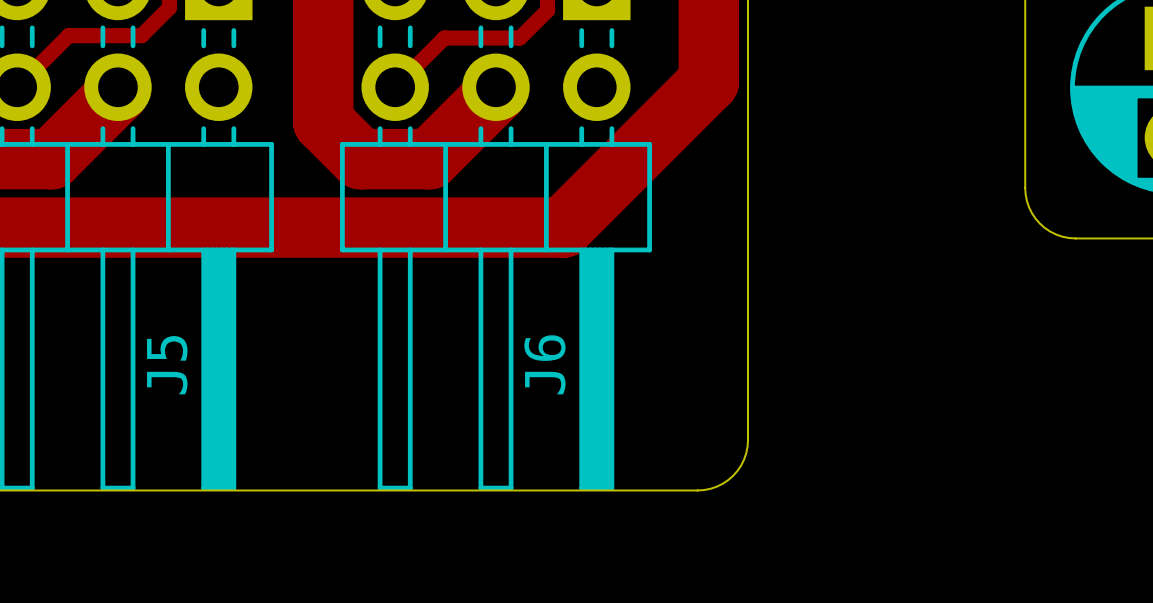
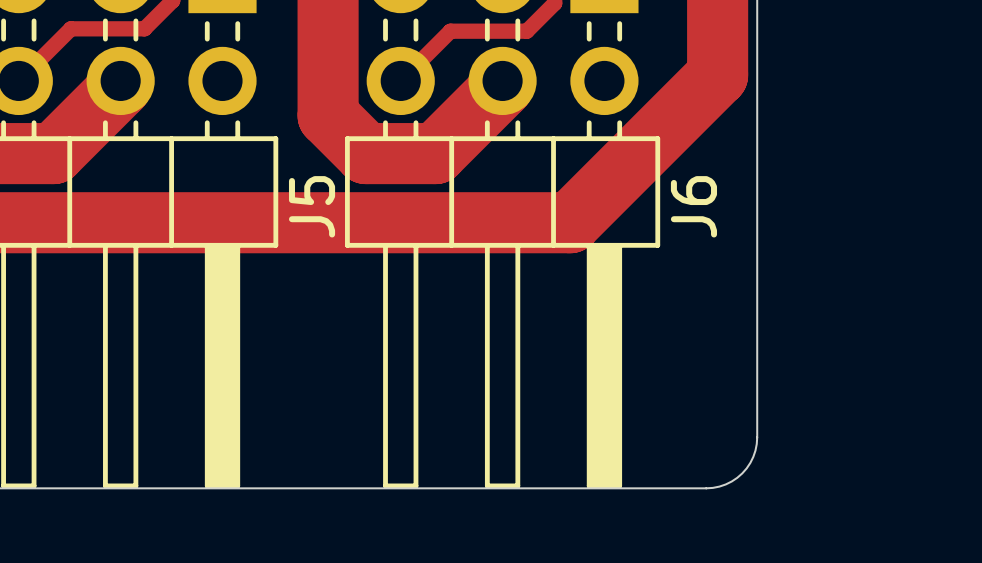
J6 name position: J6 (544, 364) -> J6 (693, 206)
J5 name position: J5 (167, 365) -> J5 (312, 206)

